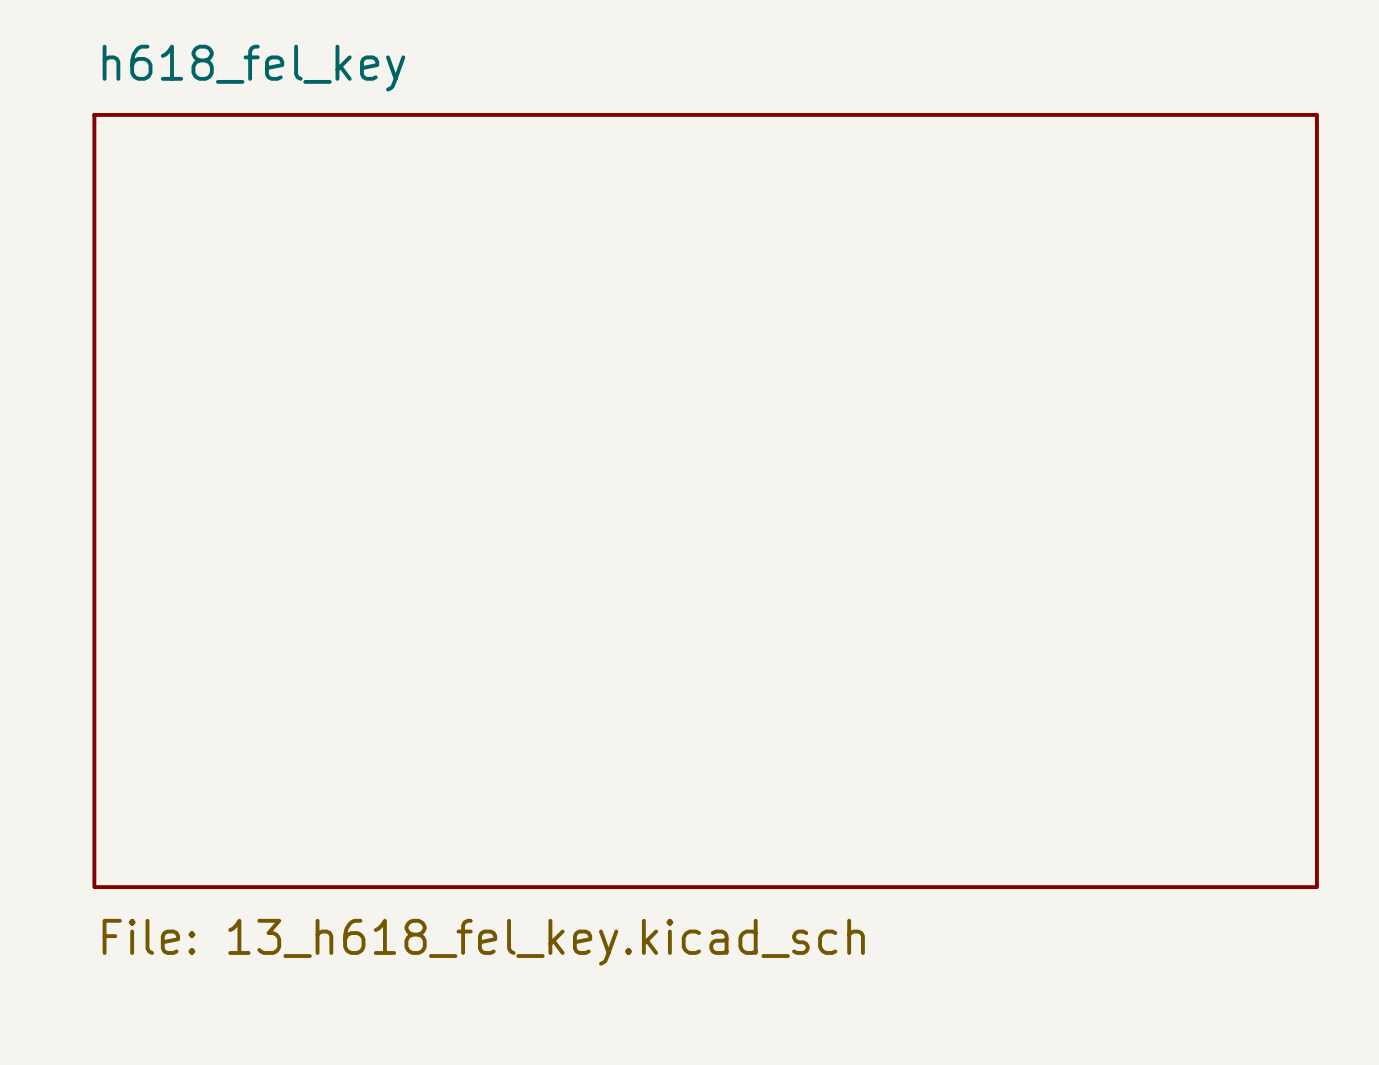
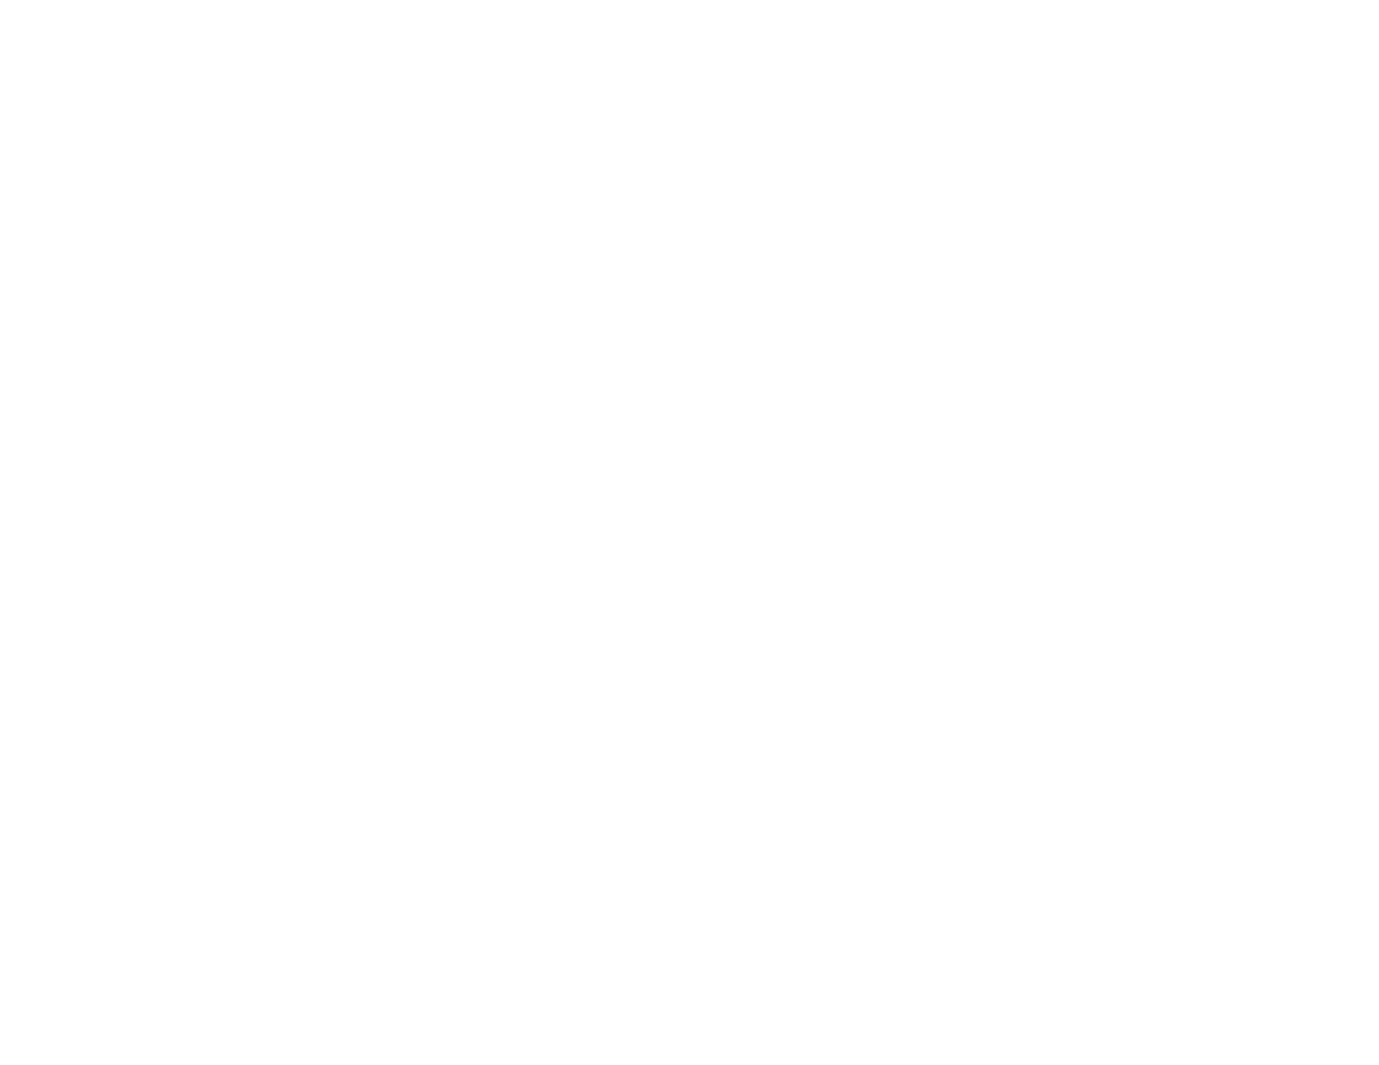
sheet h618_fel_key: File: 13_h618_fel_key.kicad_sch (705, 501) -> none

